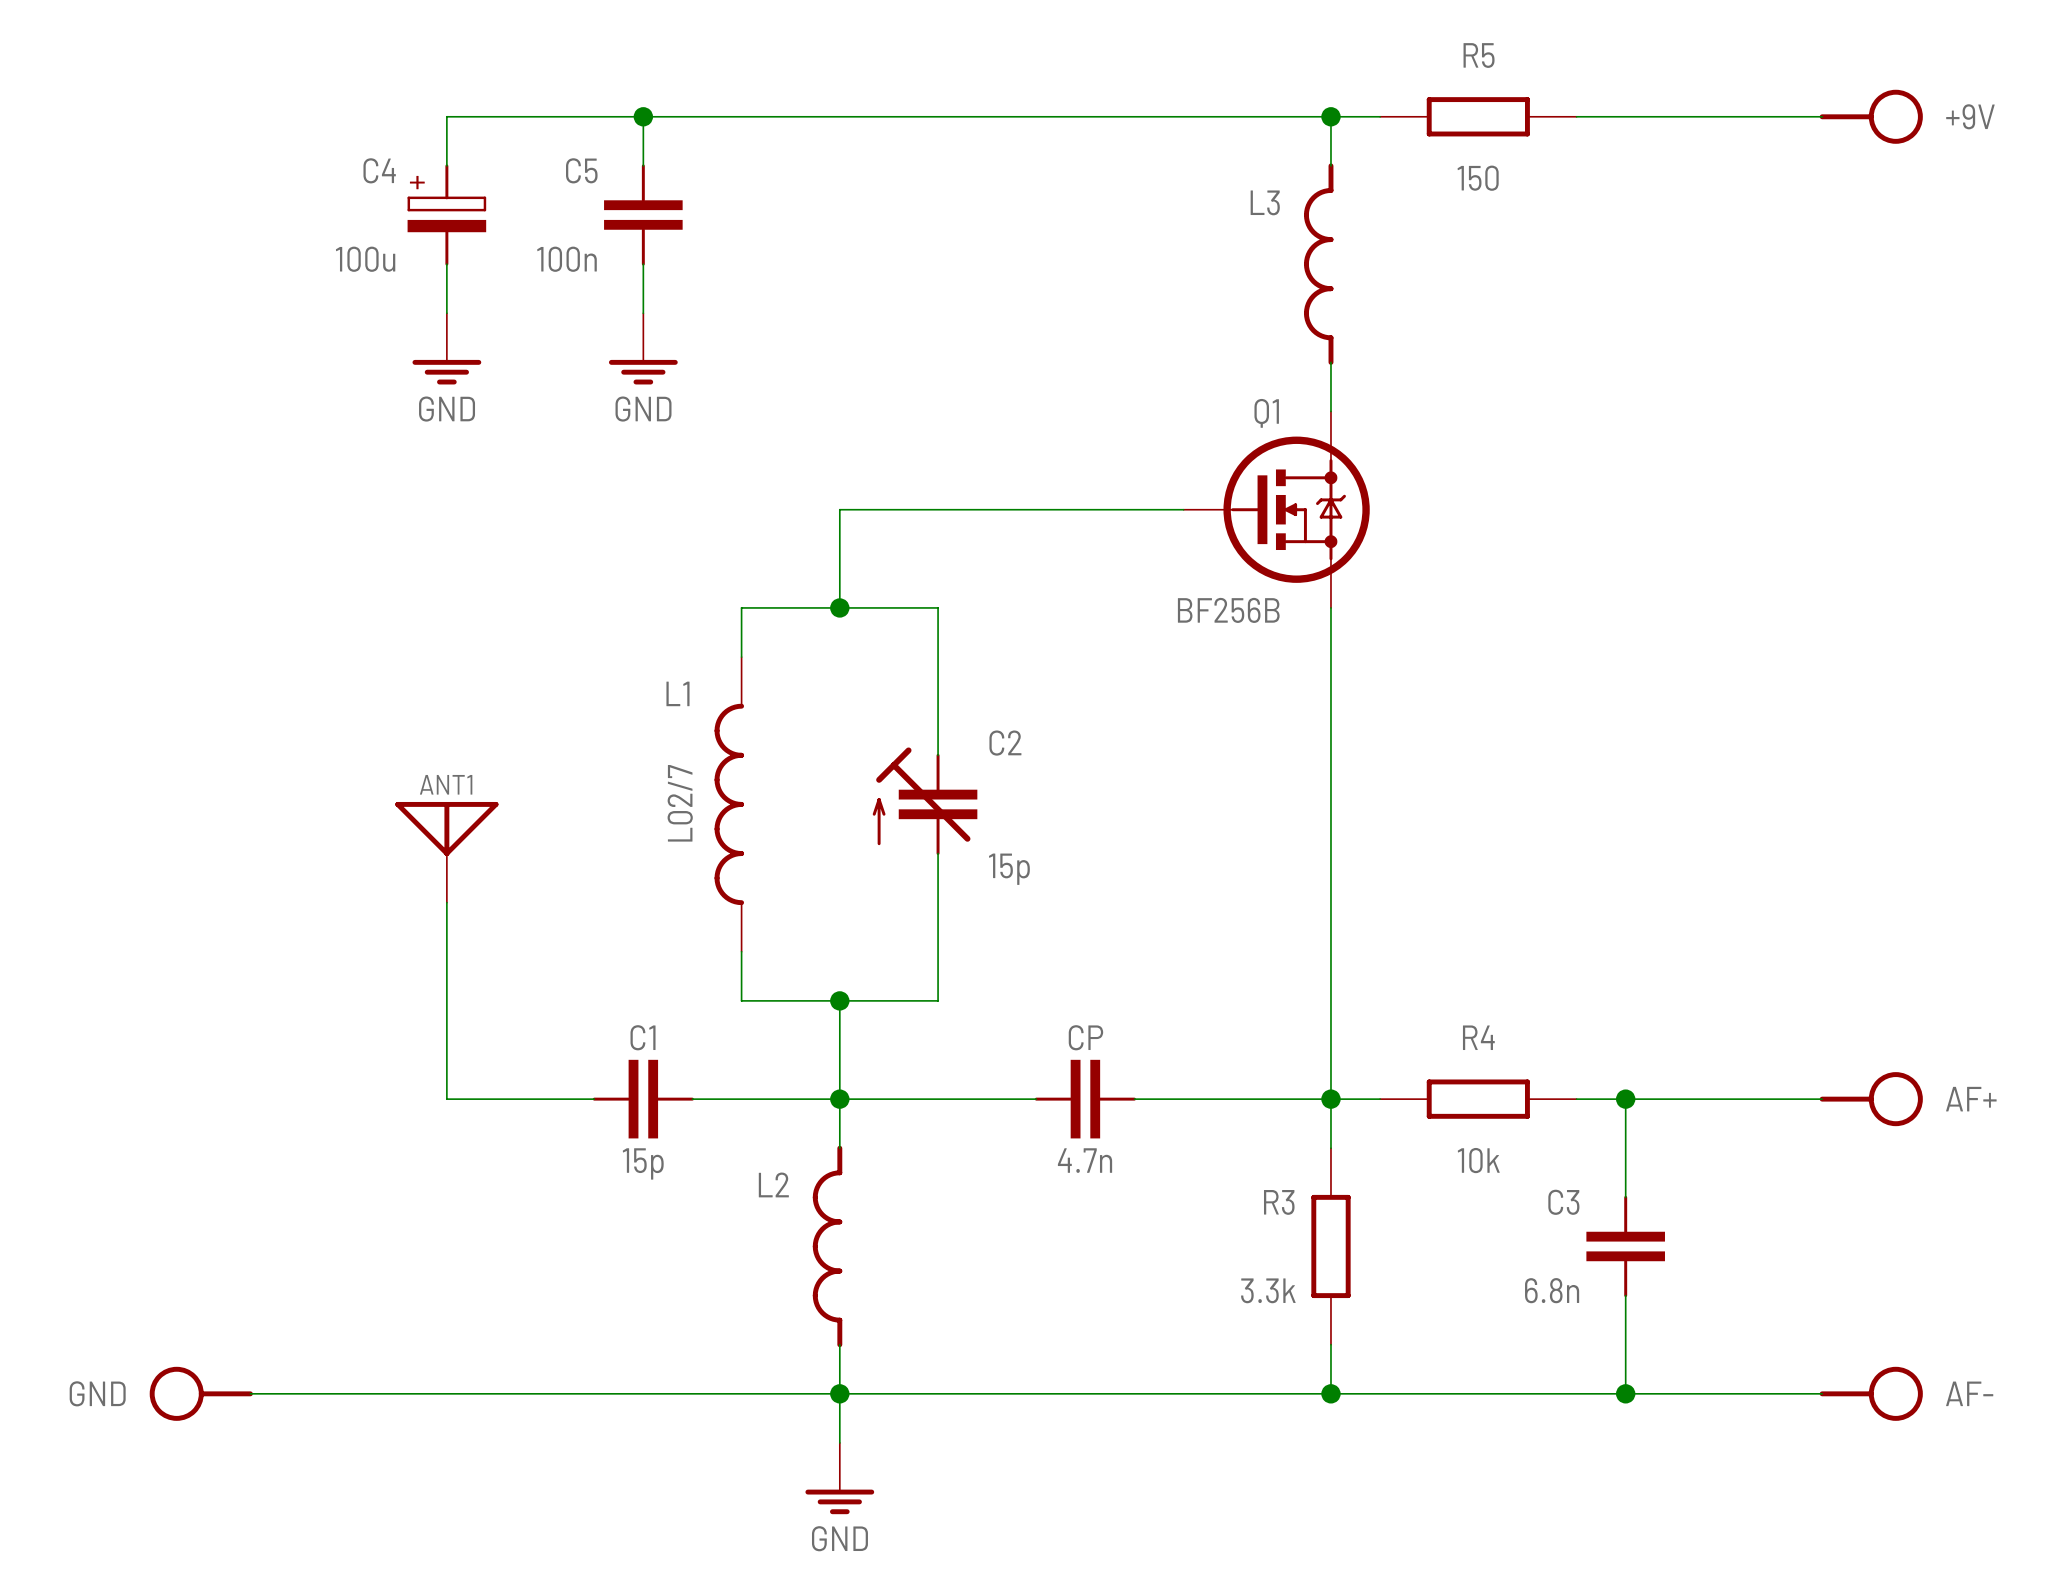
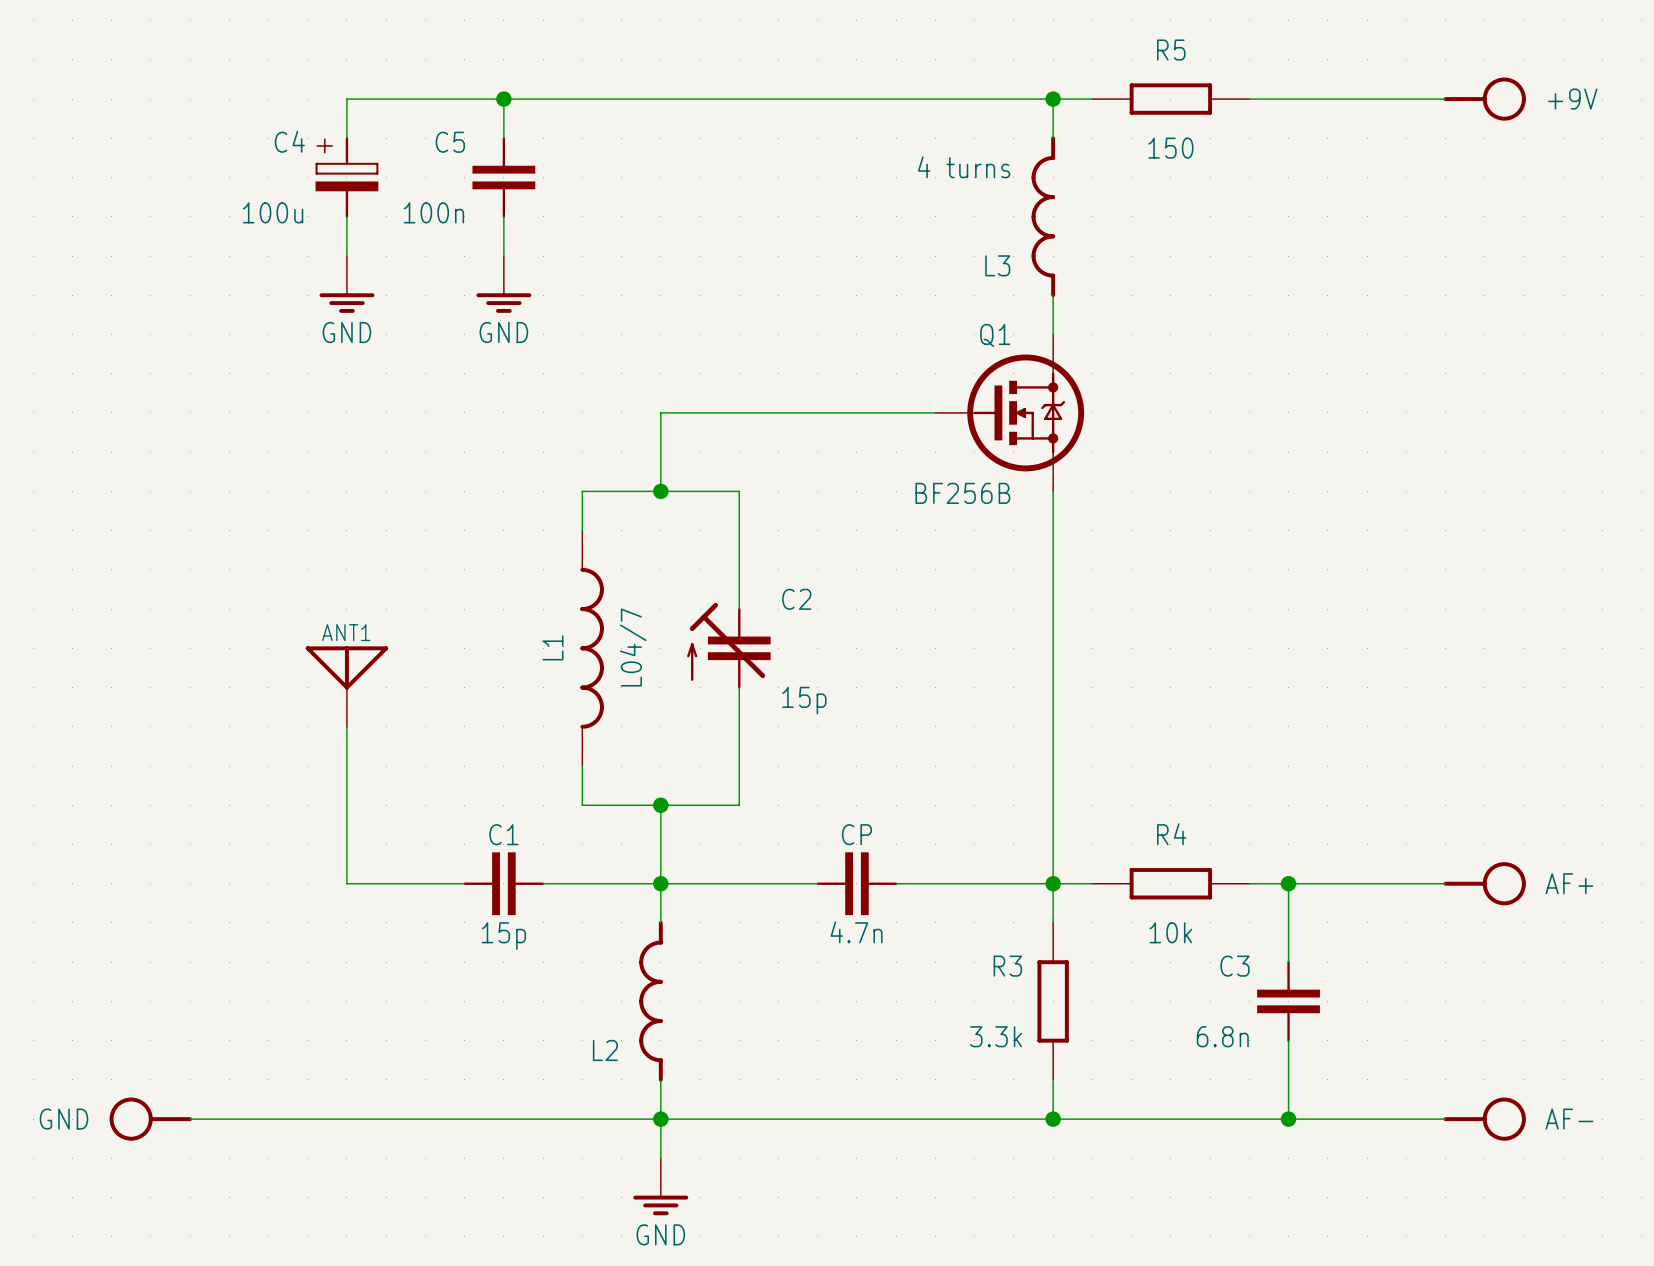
L3 value: none -> 4 turns (964, 167)
L3 name position: L3 (1265, 202) -> L3 (997, 265)
L1 name position: L1 (677, 693) -> L1 (552, 647)
L1 value: L02/7 (680, 803) -> L04/7 (633, 647)
L1 rotation: 0° (729, 804) -> 180° (592, 648)
L2 name position: L2 (773, 1184) -> L2 (605, 1050)

